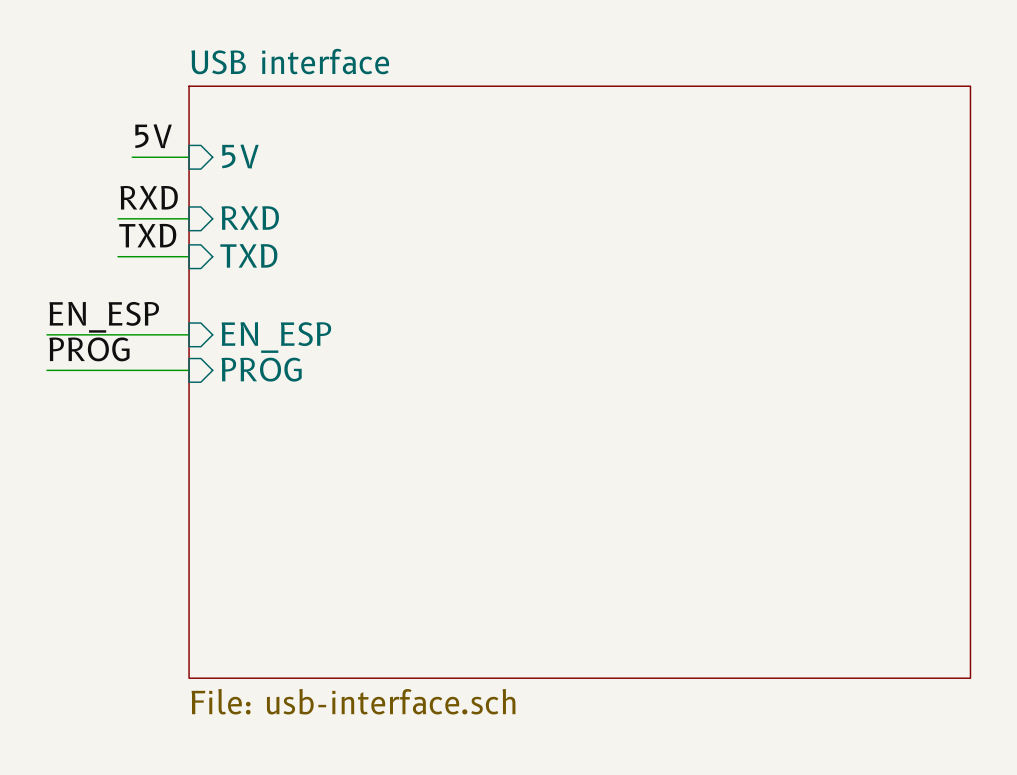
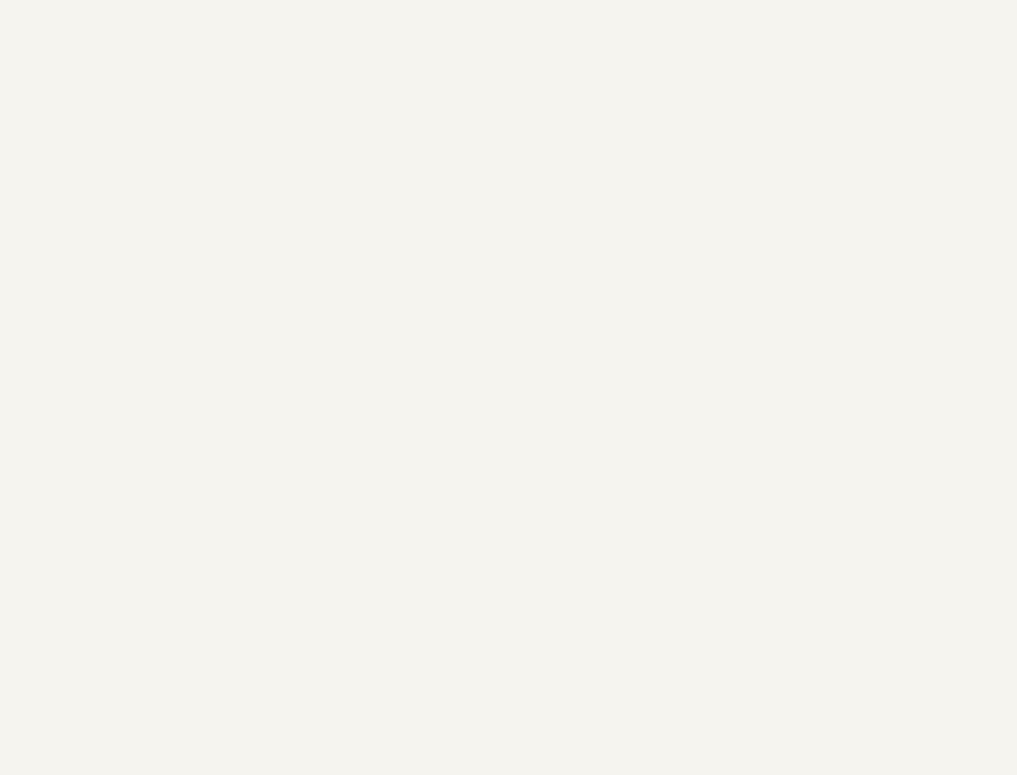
label: 5V (153, 136) -> none
sheet pin: 5V (240, 156) -> none
wire: (132, 157) (189, 157) -> none
label: RXD (149, 197) -> none
sheet pin: RXD (250, 217) -> none
wire: (118, 218) (189, 218) -> none
label: TXD (147, 235) -> none
sheet pin: TXD (248, 255) -> none
wire: (118, 256) (189, 256) -> none
label: EN_ESP (104, 317) -> none
wire: (46, 334) (189, 334) -> none
sheet pin: EN_ESP (276, 337) -> none
label: PROG (89, 349) -> none
sheet pin: PROG (261, 369) -> none
wire: (46, 370) (189, 370) -> none
sheet USB interface: File: usb-interface.sch (579, 382) -> none

